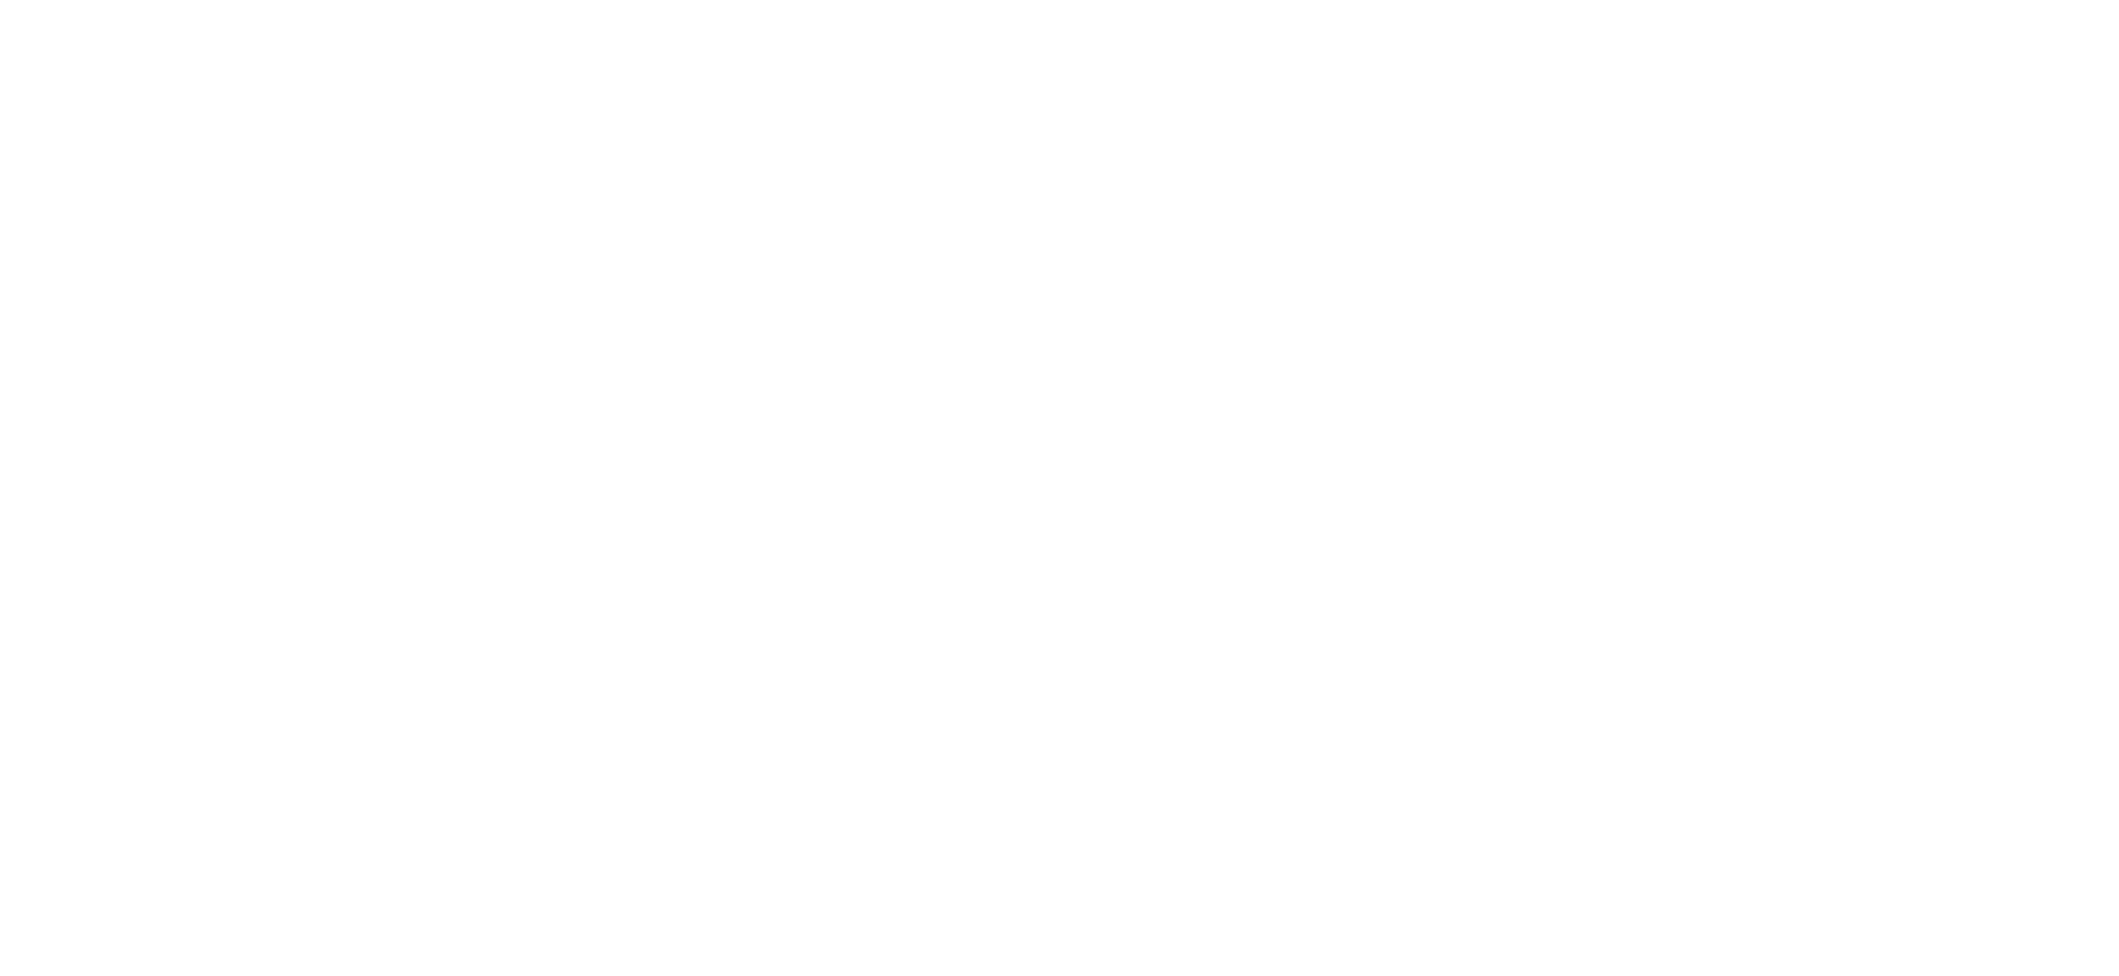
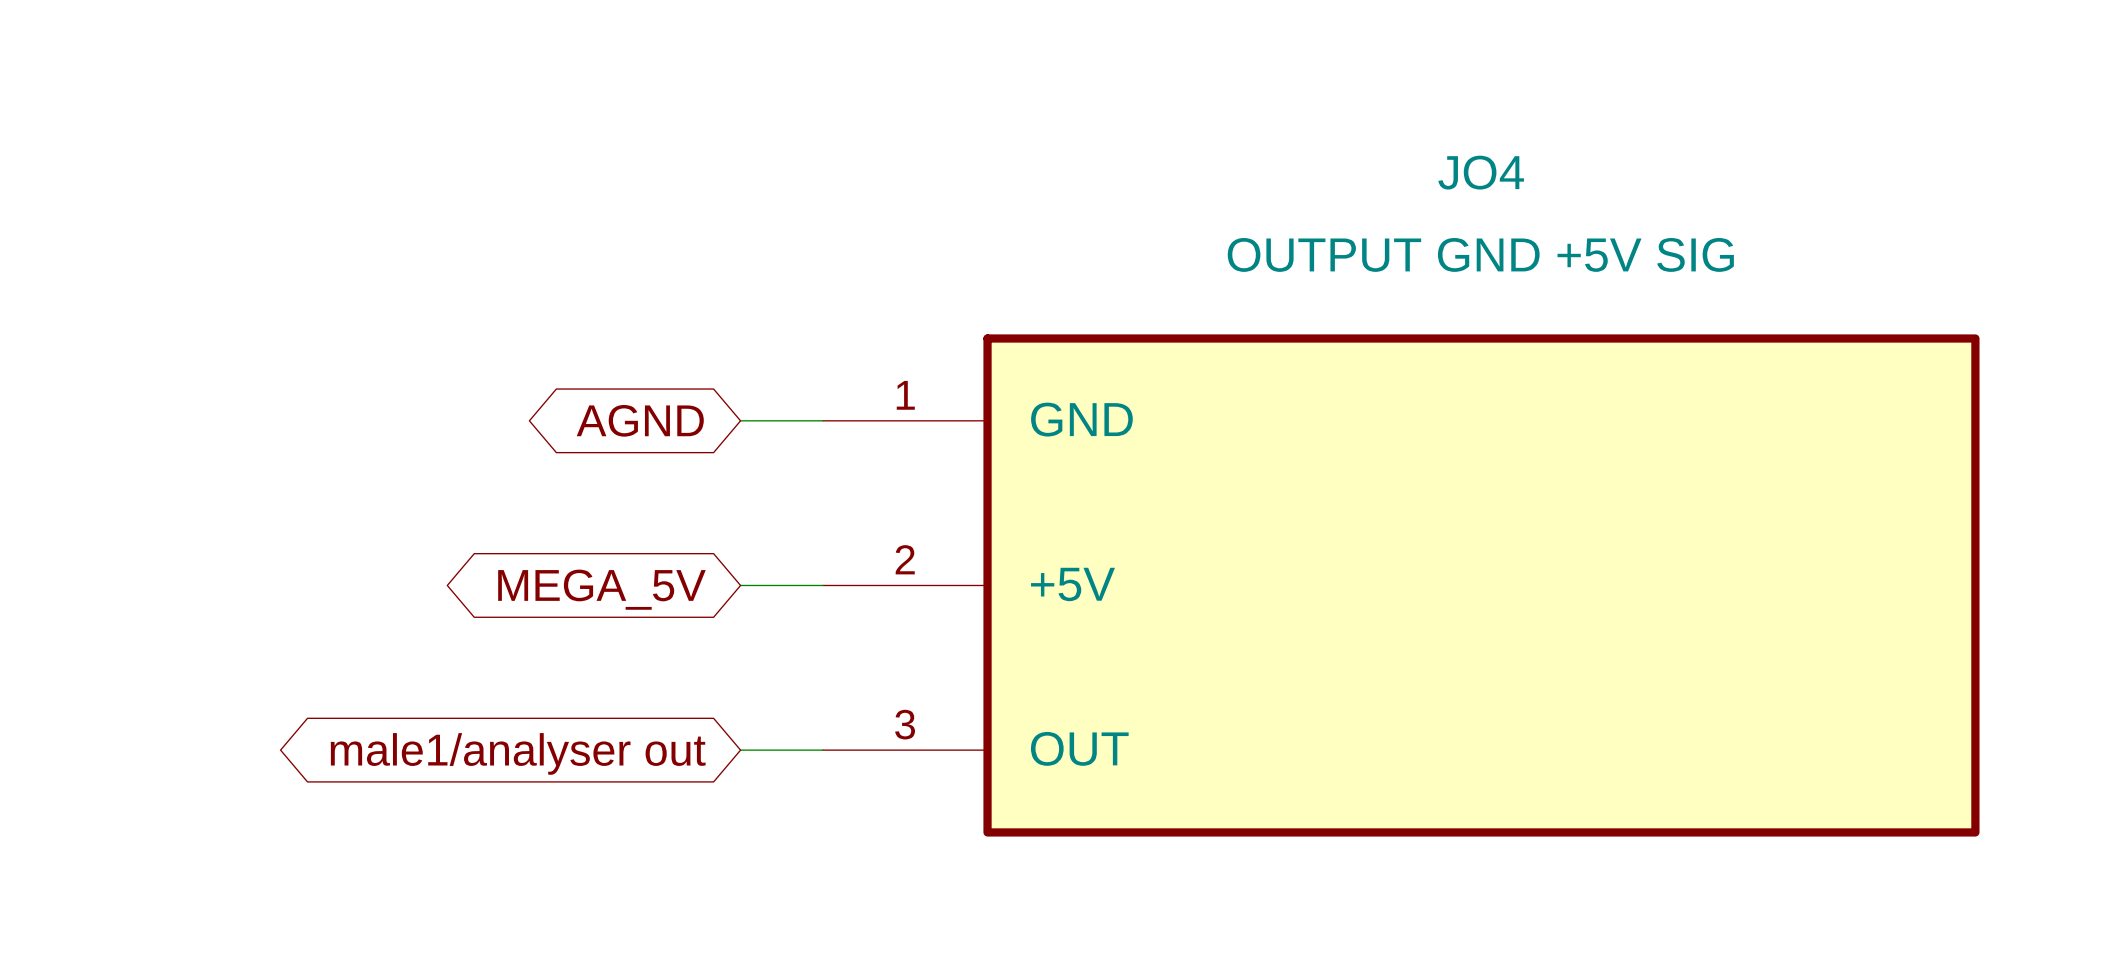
global label: none -> AGND (640, 420)
wire: none -> (740, 420) (822, 420)
wire: none -> (740, 585) (822, 585)
JO4: none -> OUTPUT GND +5V SIG (1401, 585)
global label: none -> MEGA_5V (601, 589)
wire: none -> (740, 750) (822, 750)
global label: none -> male1/analyser out (518, 753)

